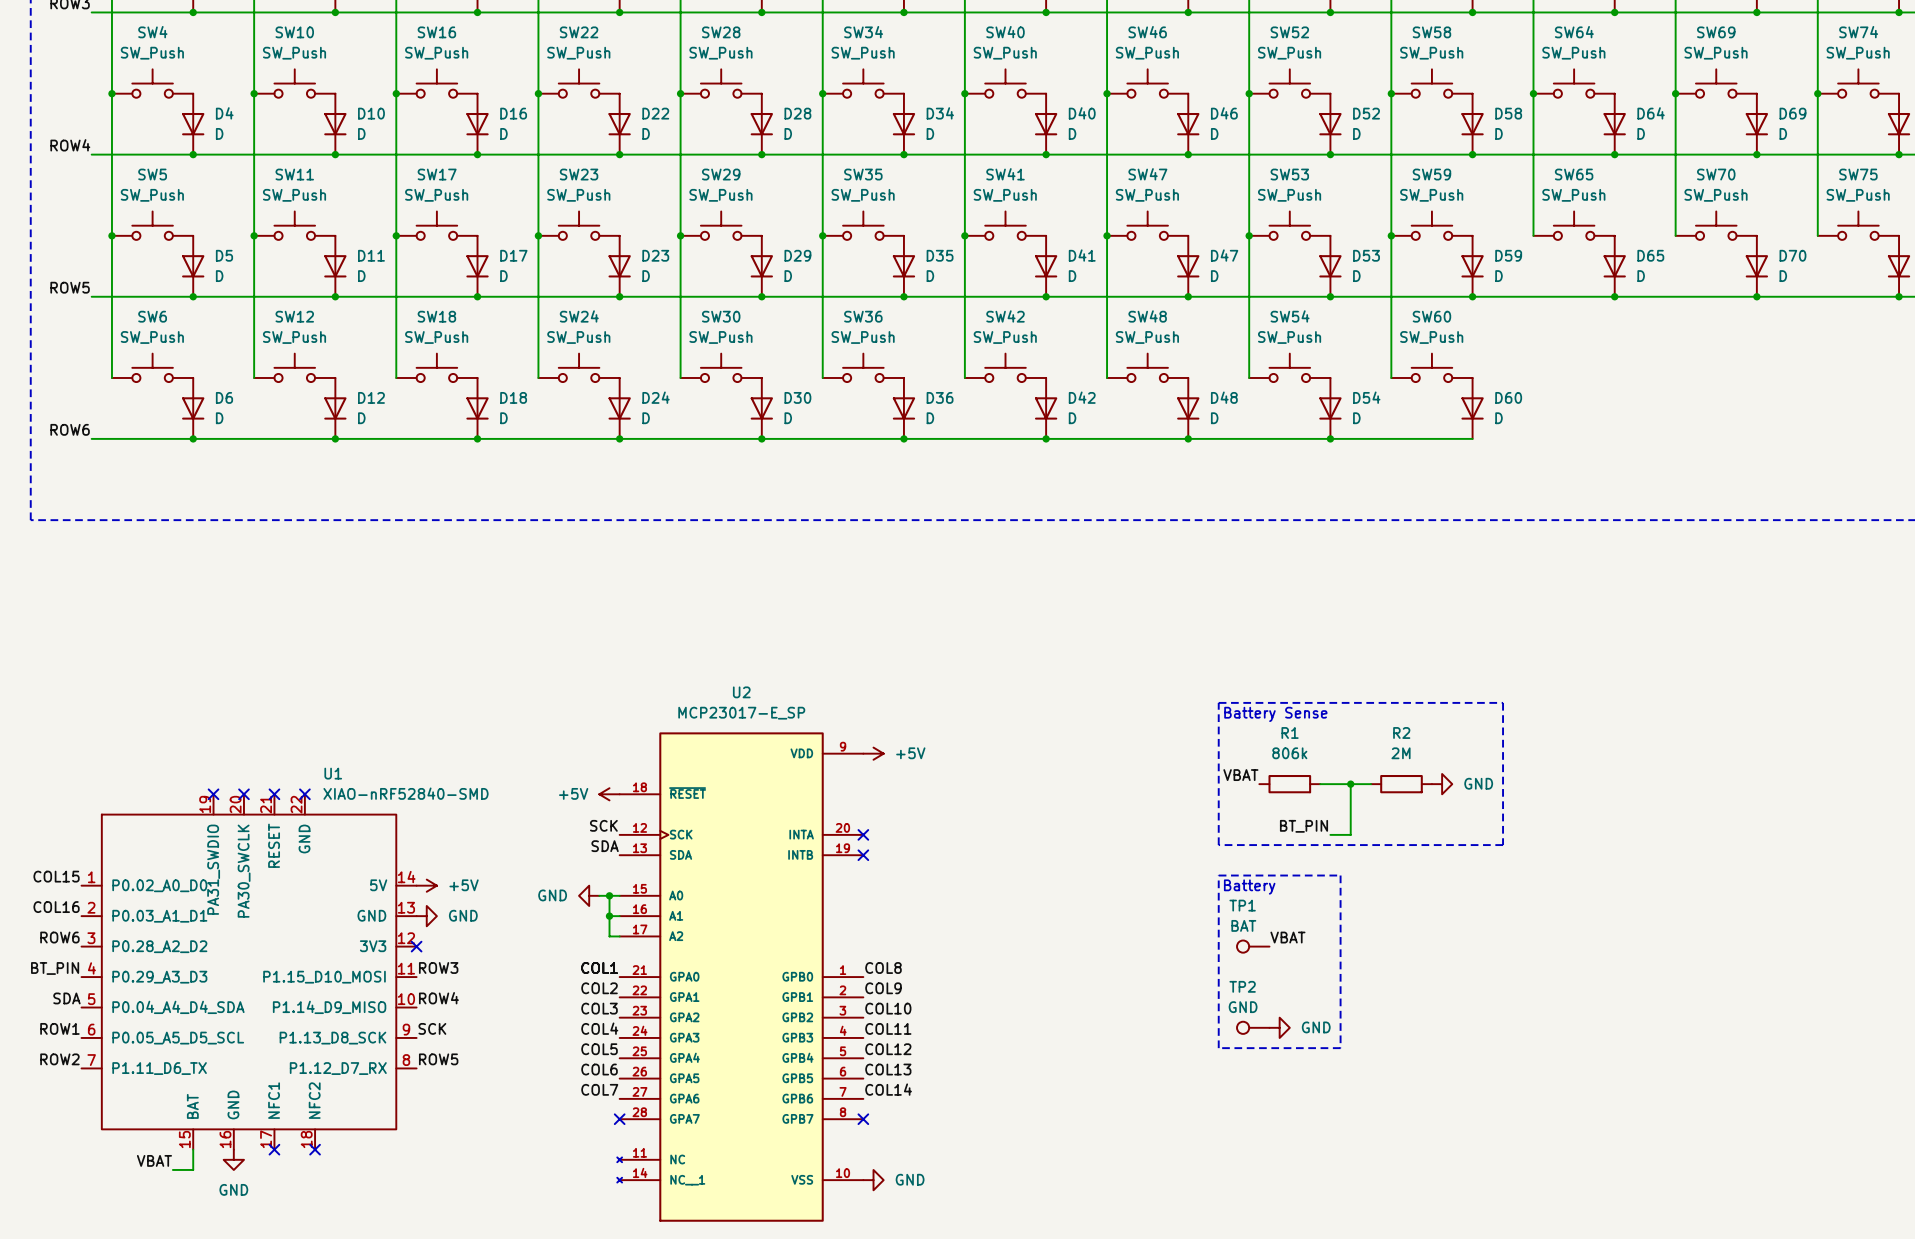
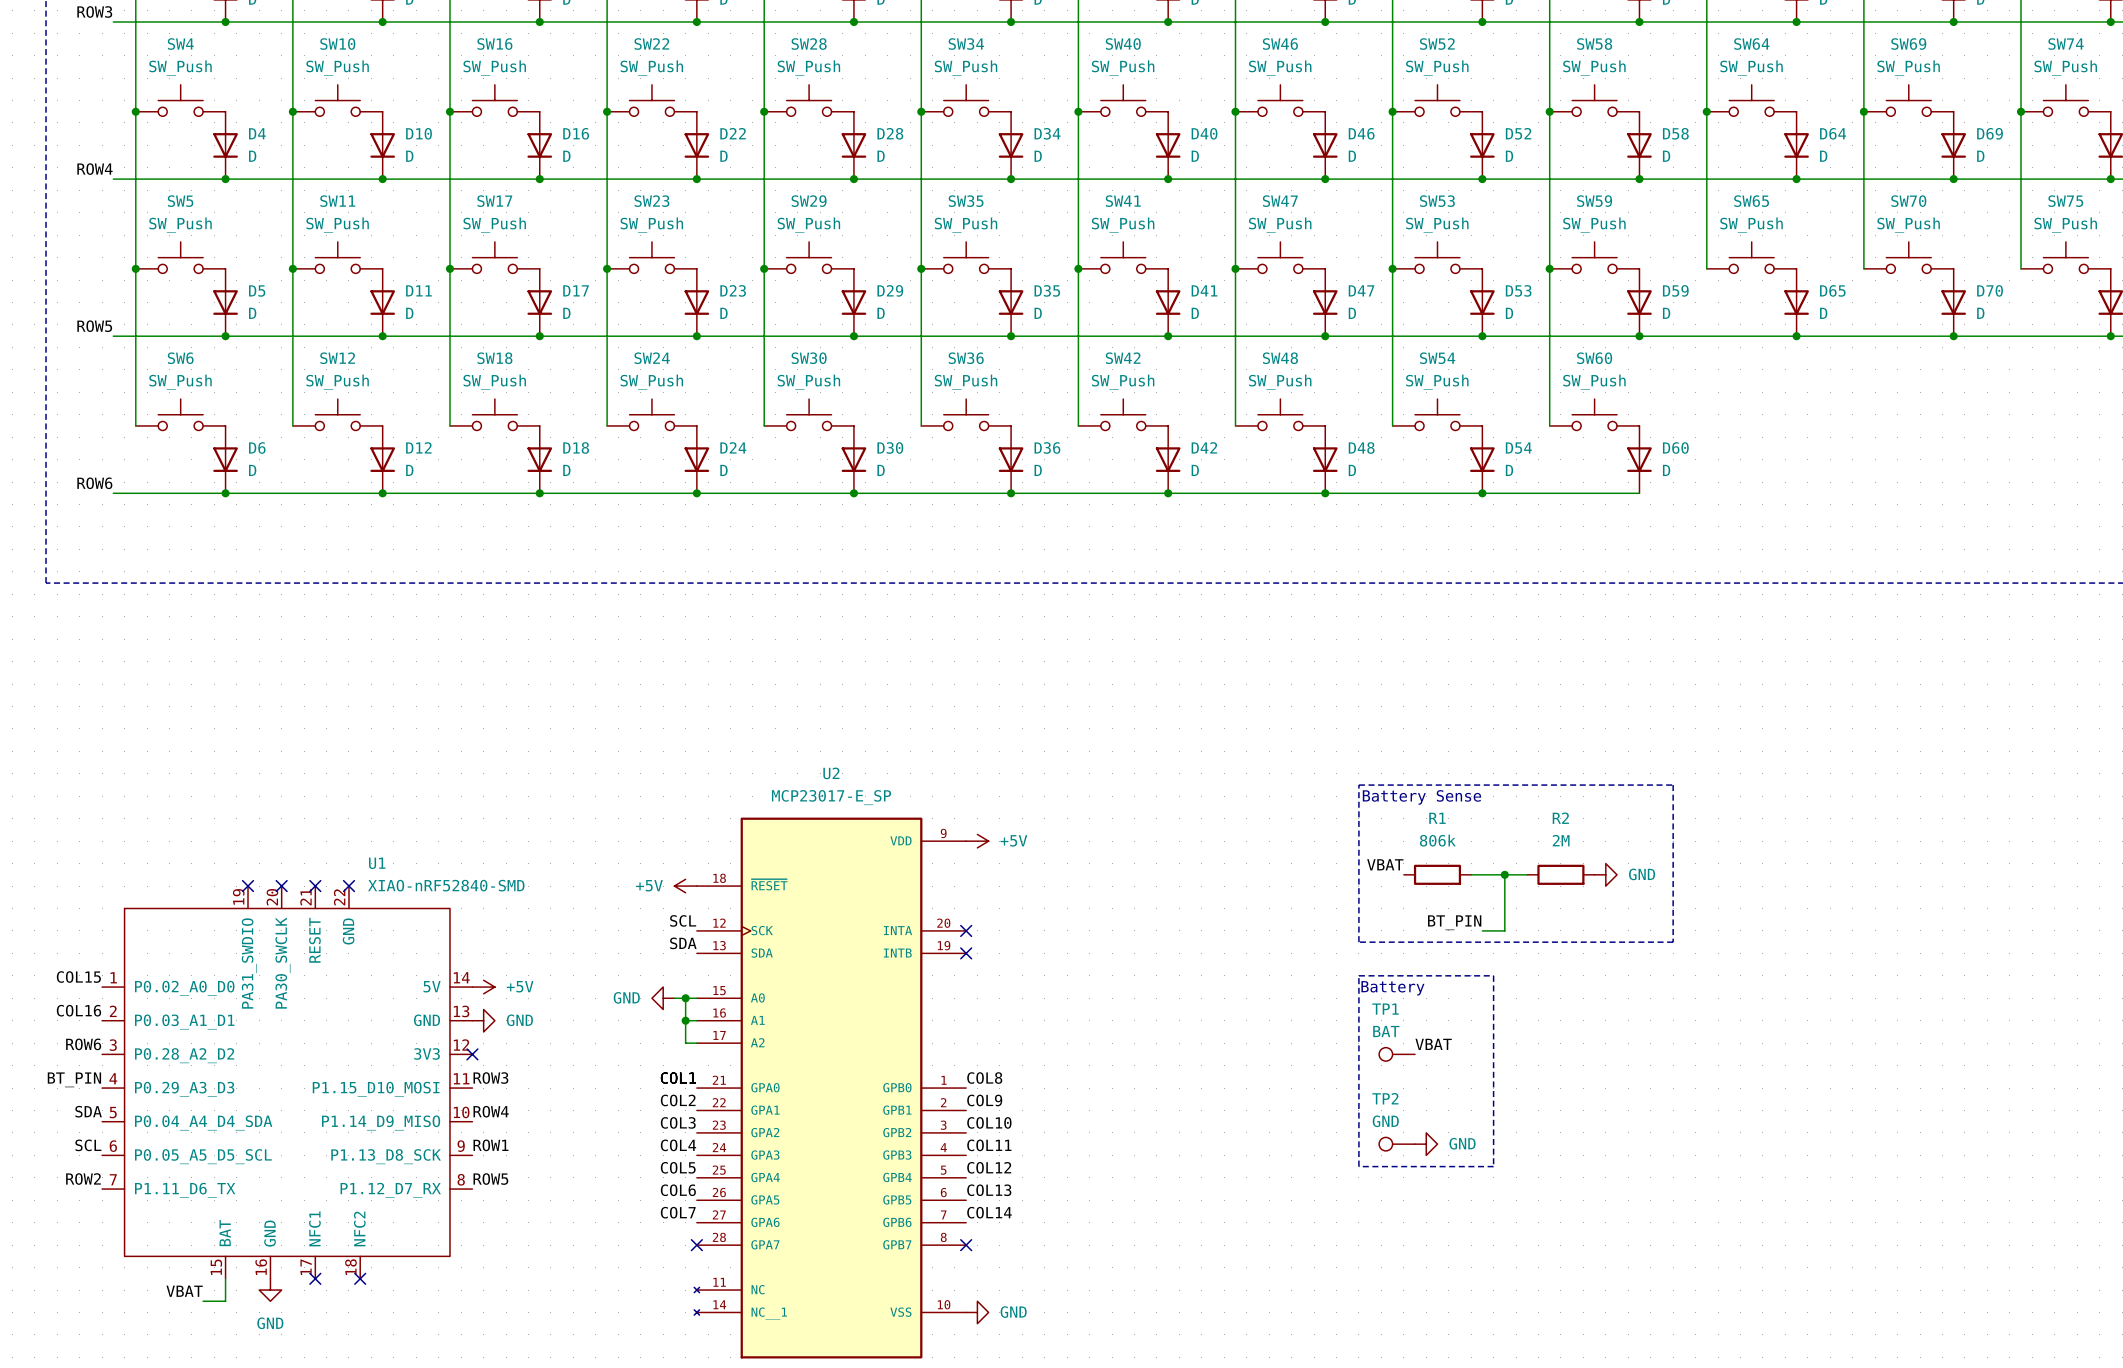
label: SCK (603, 825) -> SCL (683, 920)
label: ROW1 (59, 1028) -> SCL (88, 1145)
label: SCK (432, 1028) -> ROW1 (490, 1145)

